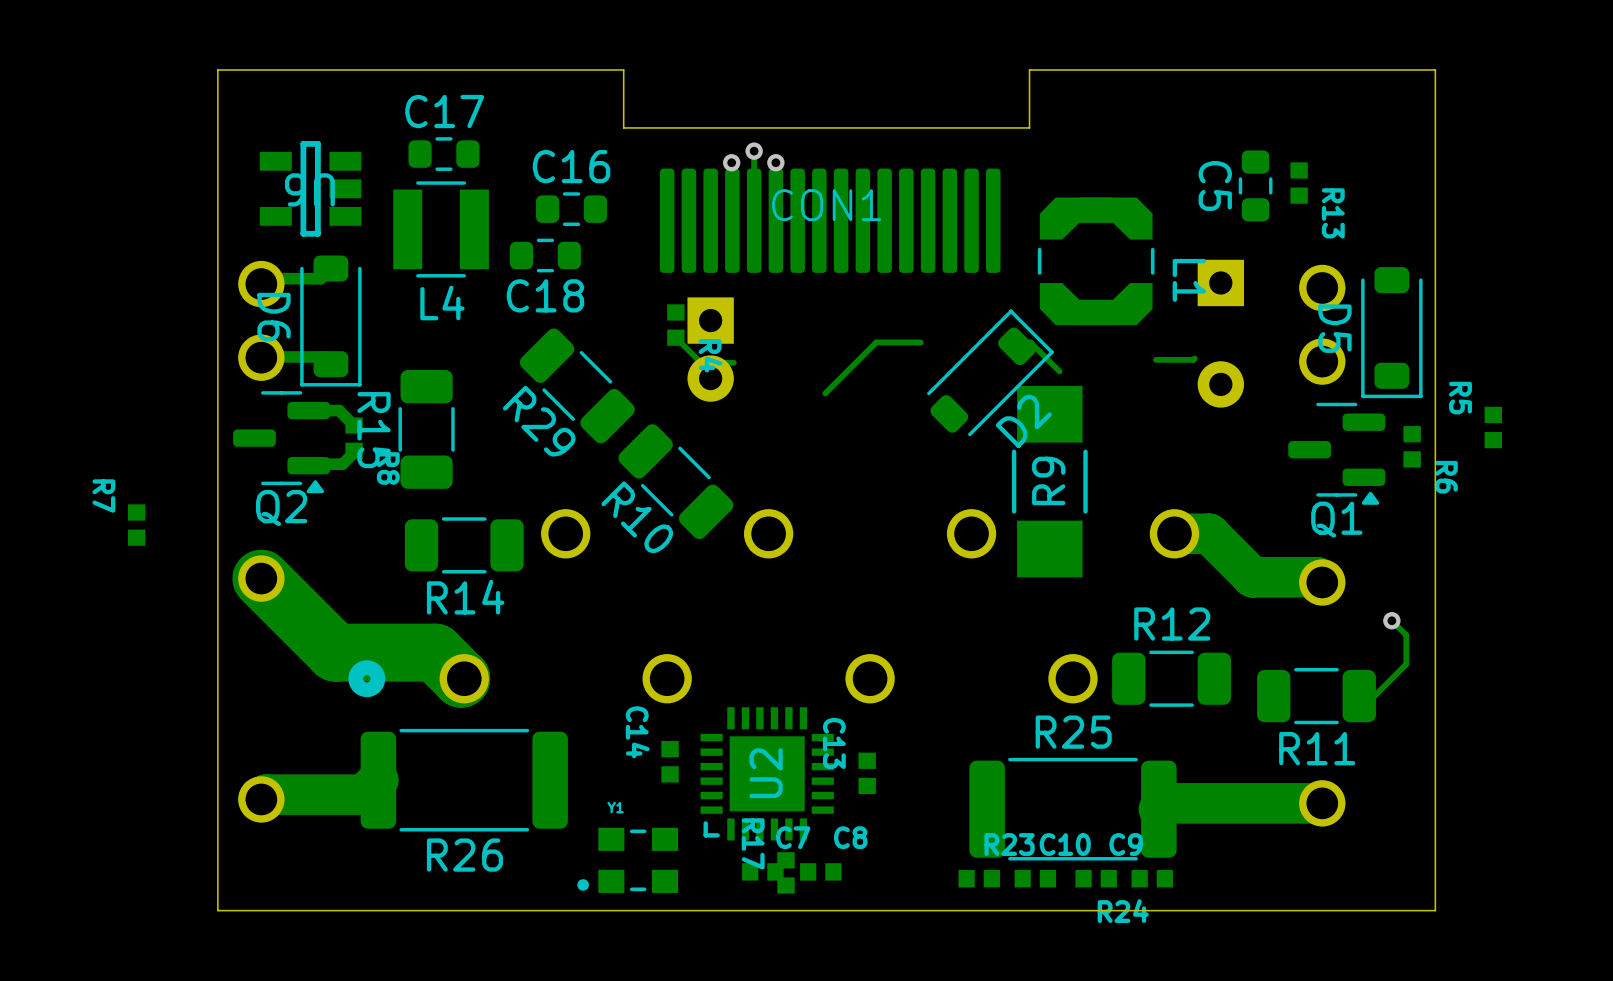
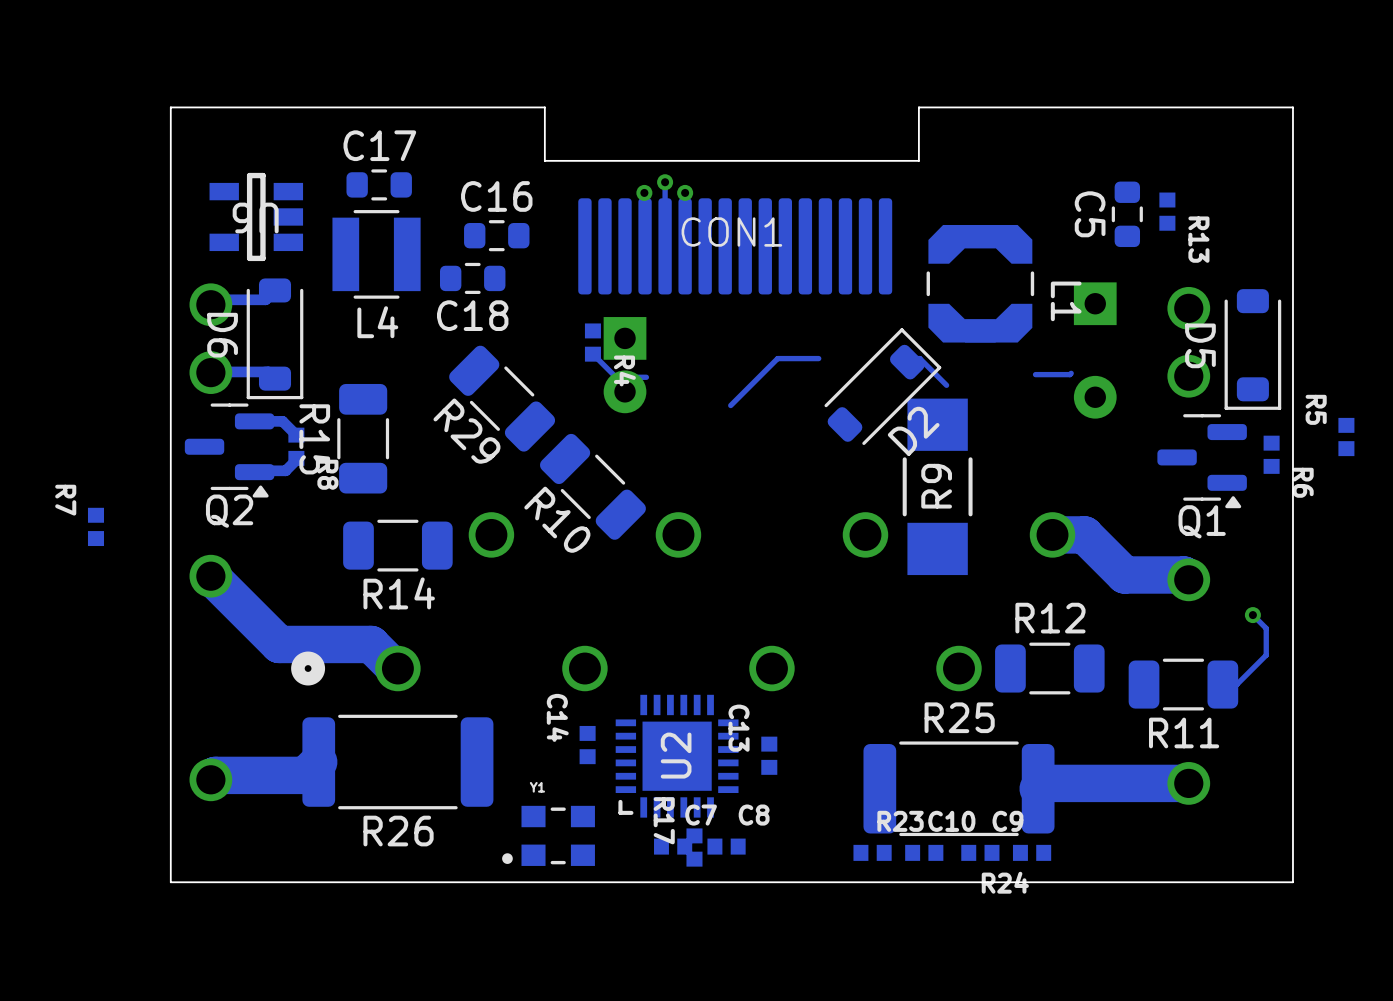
track width: thick (261, 578) (335, 652) (435, 652) (461, 678) -> thin (210, 576) (279, 644) (371, 644) (395, 668)

